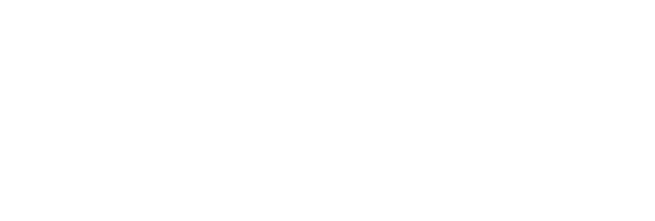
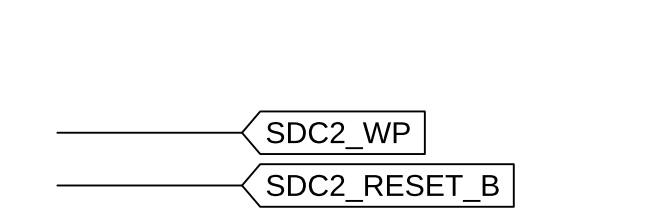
wire: none -> (57, 132) (242, 132)
global label: none -> SDC2_WP (338, 135)
wire: none -> (57, 185) (242, 185)
global label: none -> SDC2_RESET_B (382, 188)

